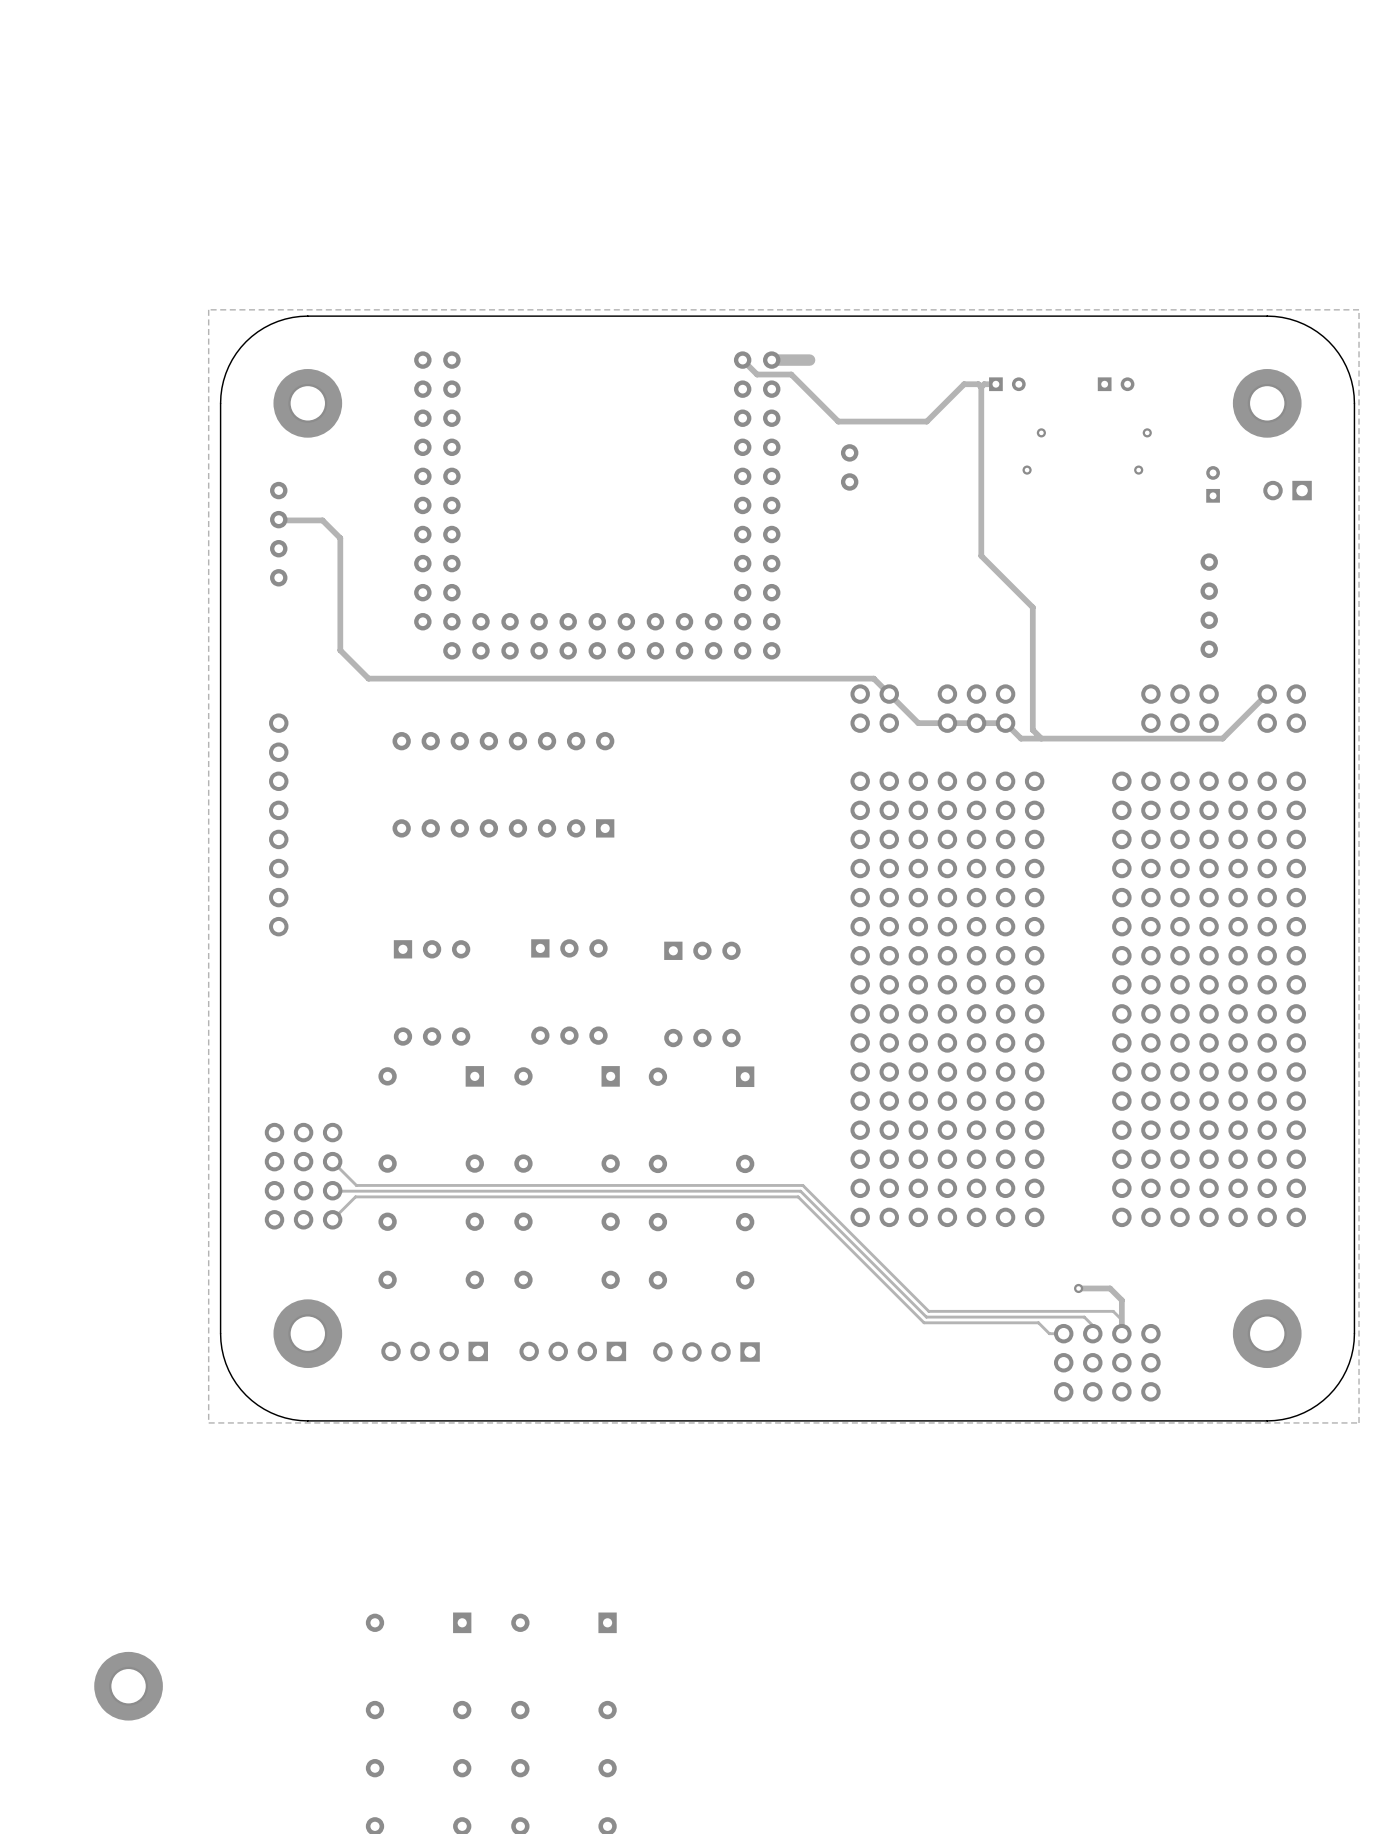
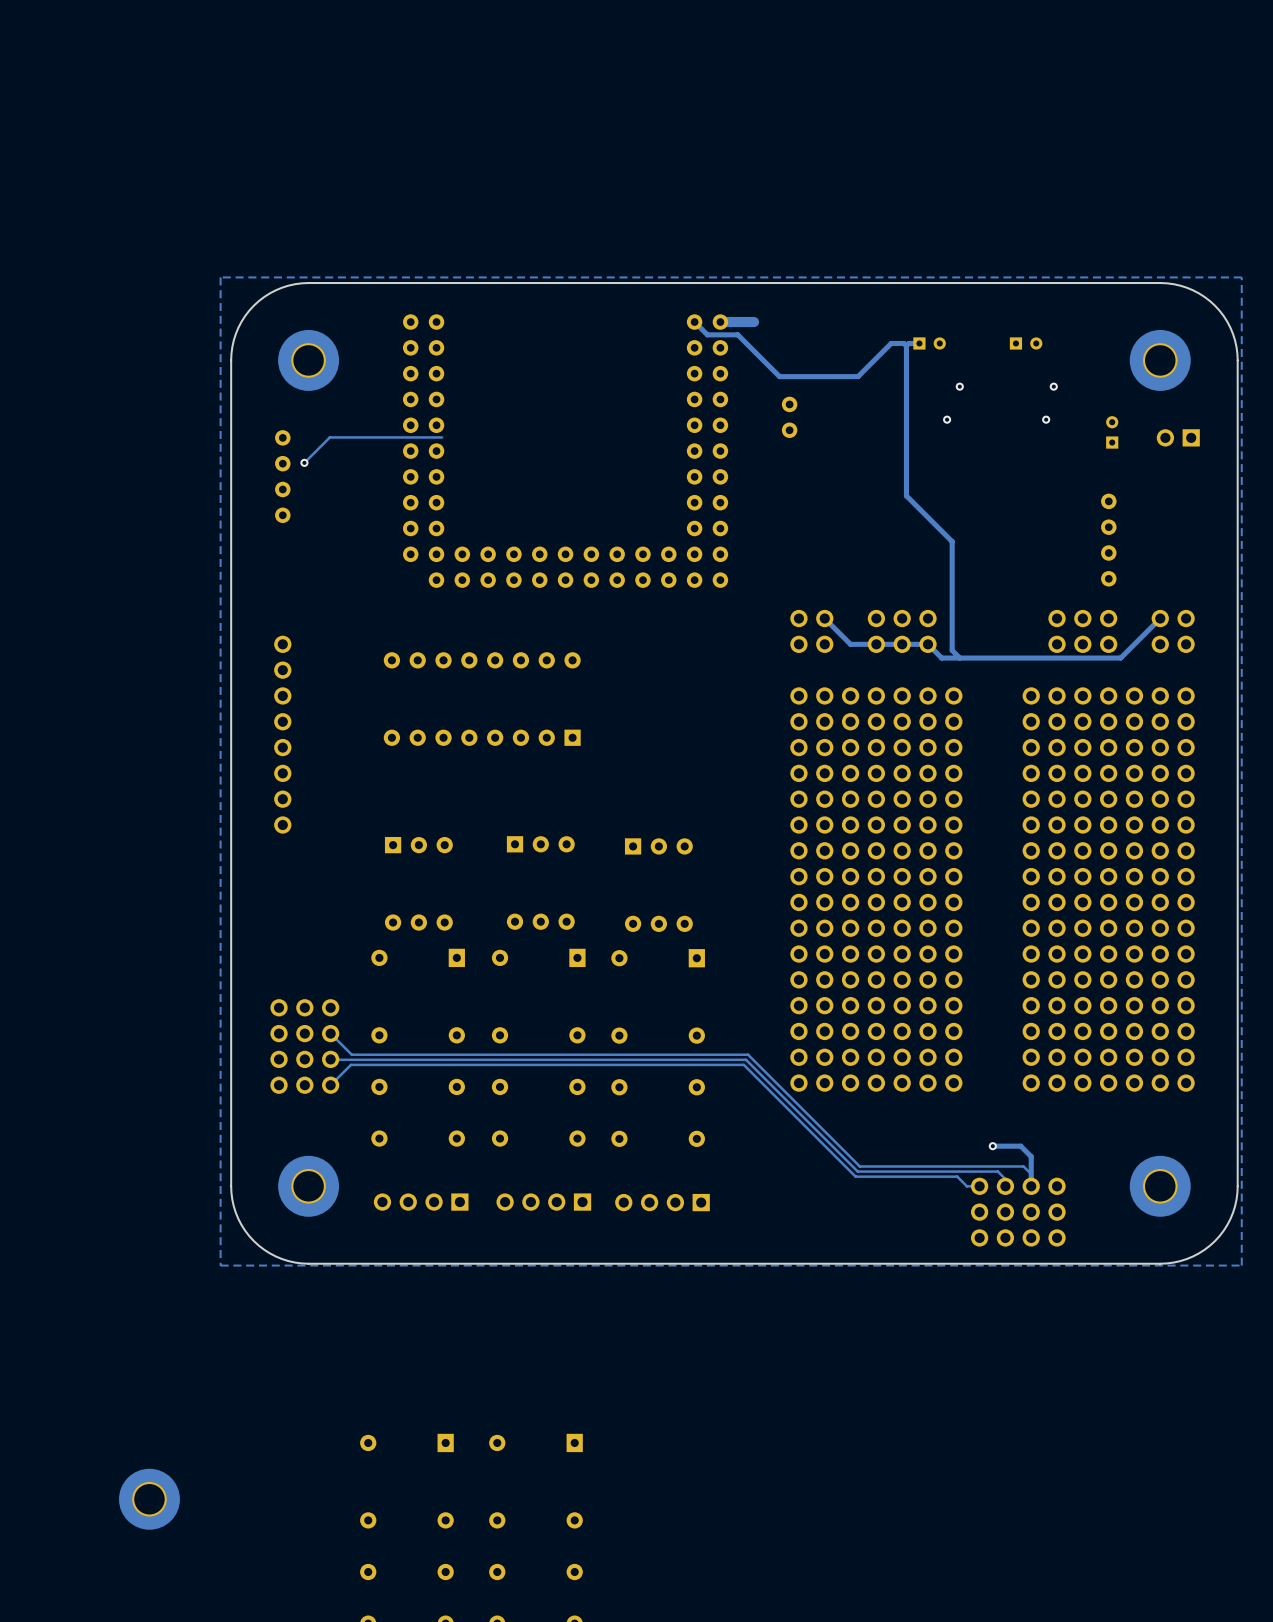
track: none -> (442, 437) (329, 437) (304, 462)
via: none -> (304, 462)
track: (278, 519) (322, 520) (340, 538) (340, 650) (368, 678) (873, 678) (889, 694) -> none

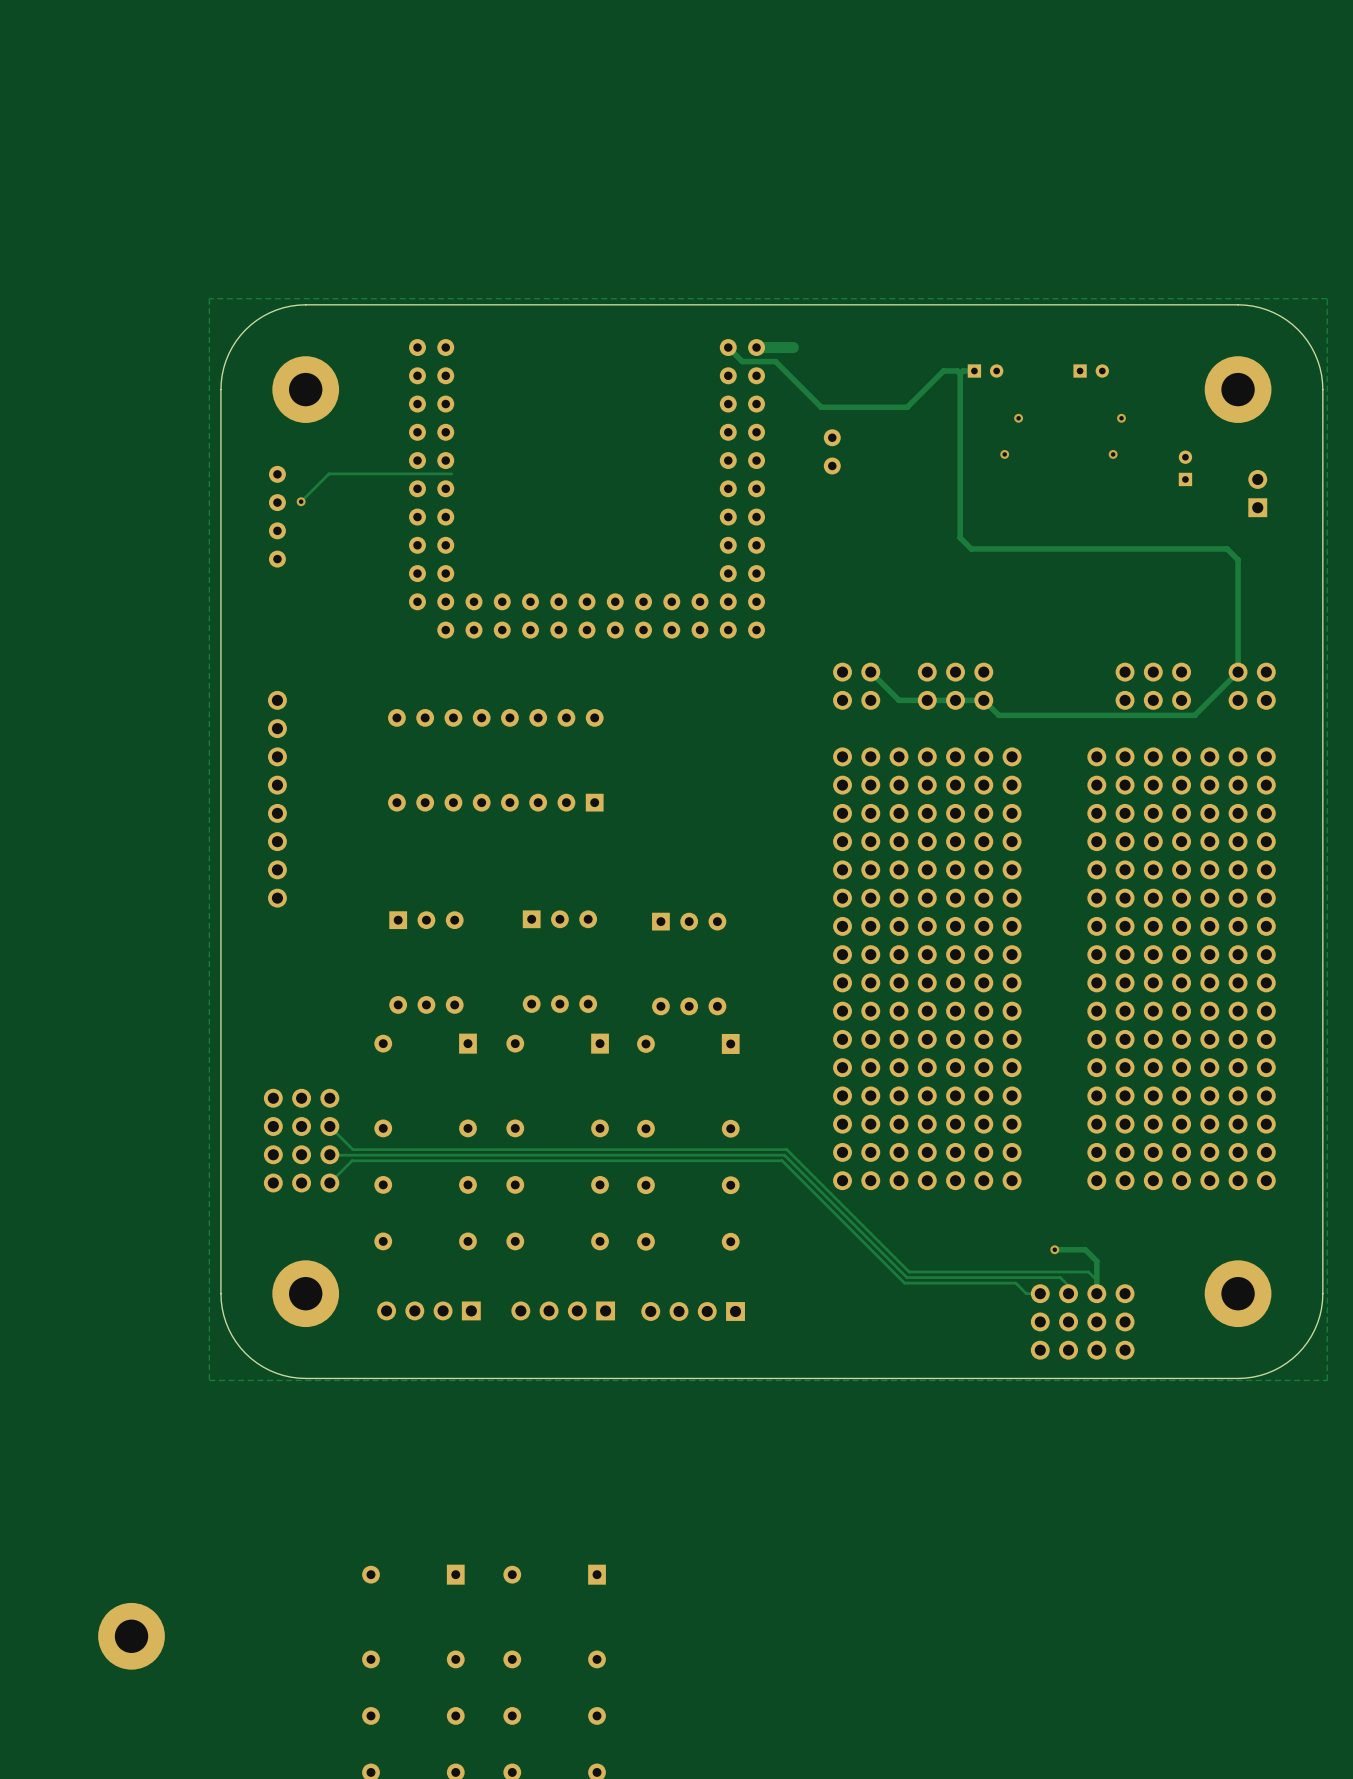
part rotation: 0° (1178, 437) -> 90° clockwise (1257, 493)
track: (916, 506) (952, 541) (952, 650) (959, 658) -> (971, 548) (1227, 548) (1238, 559) (1238, 671)
part: (1108, 540) -> none

